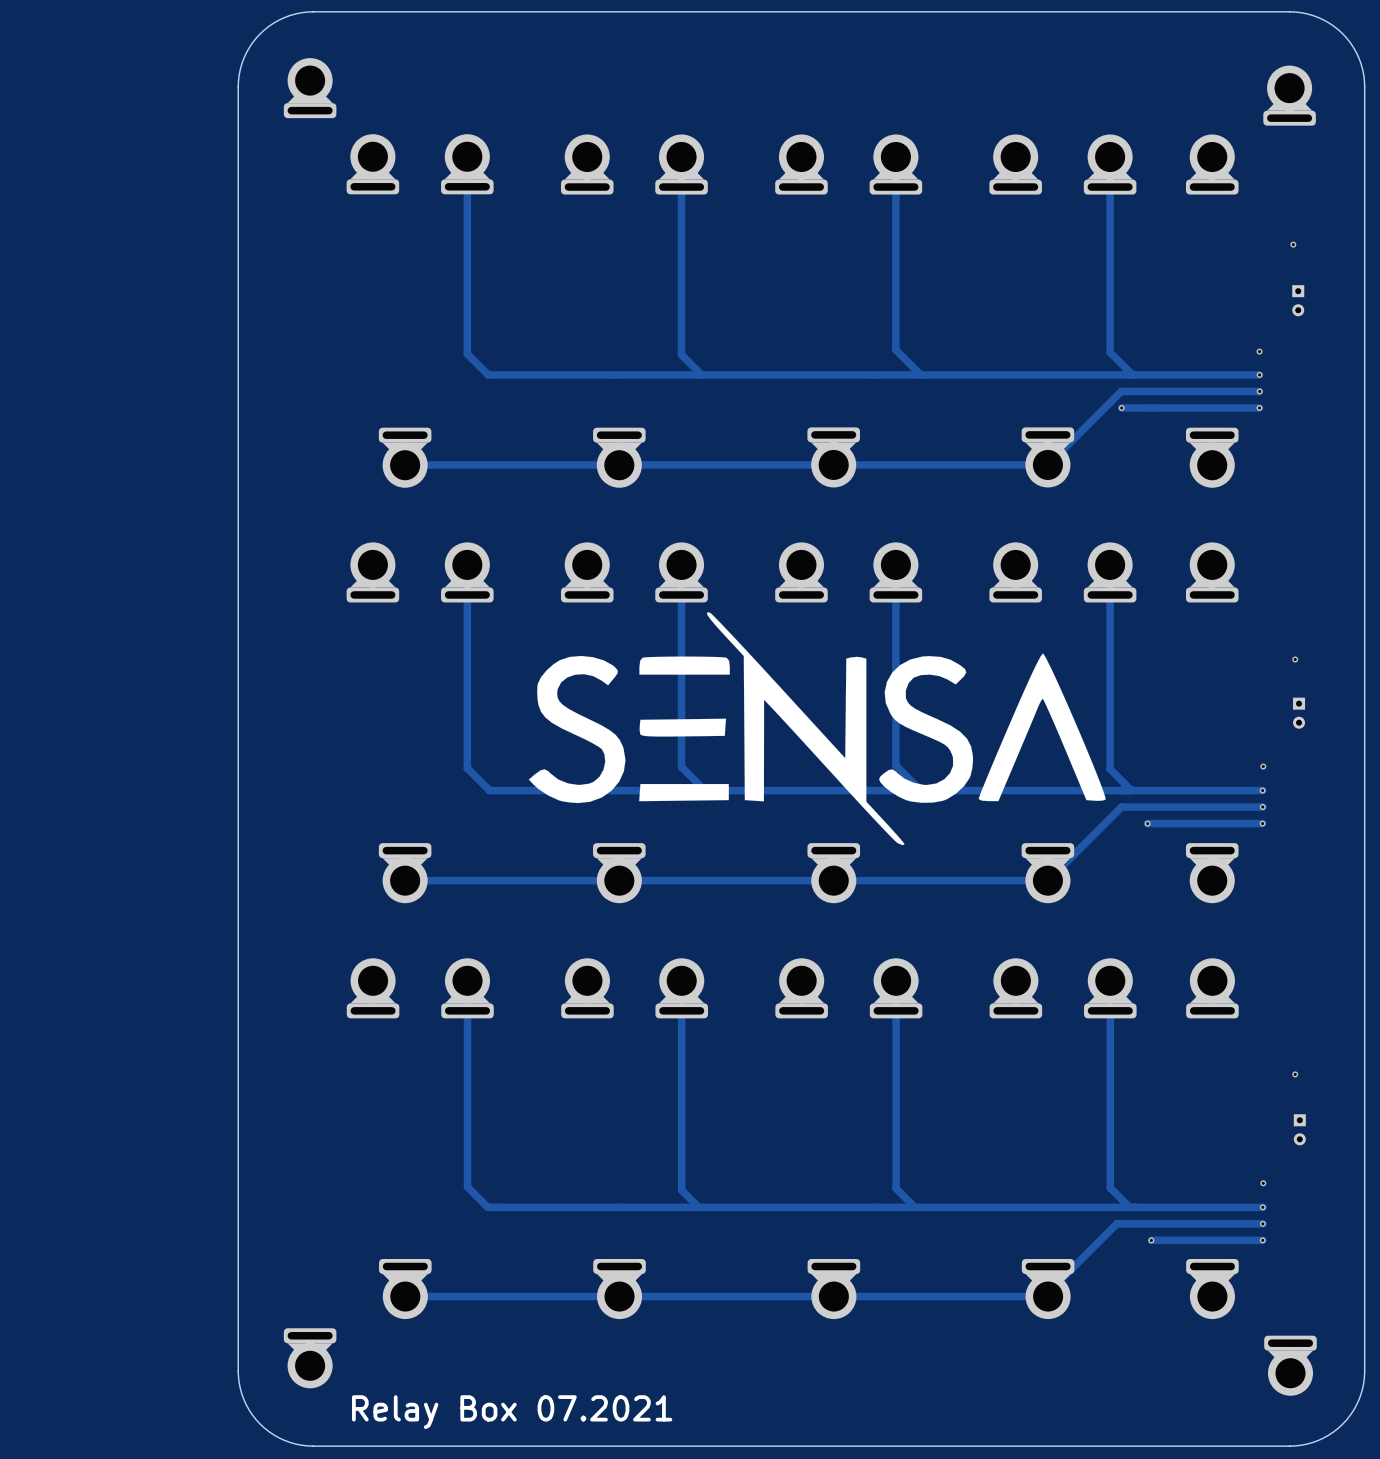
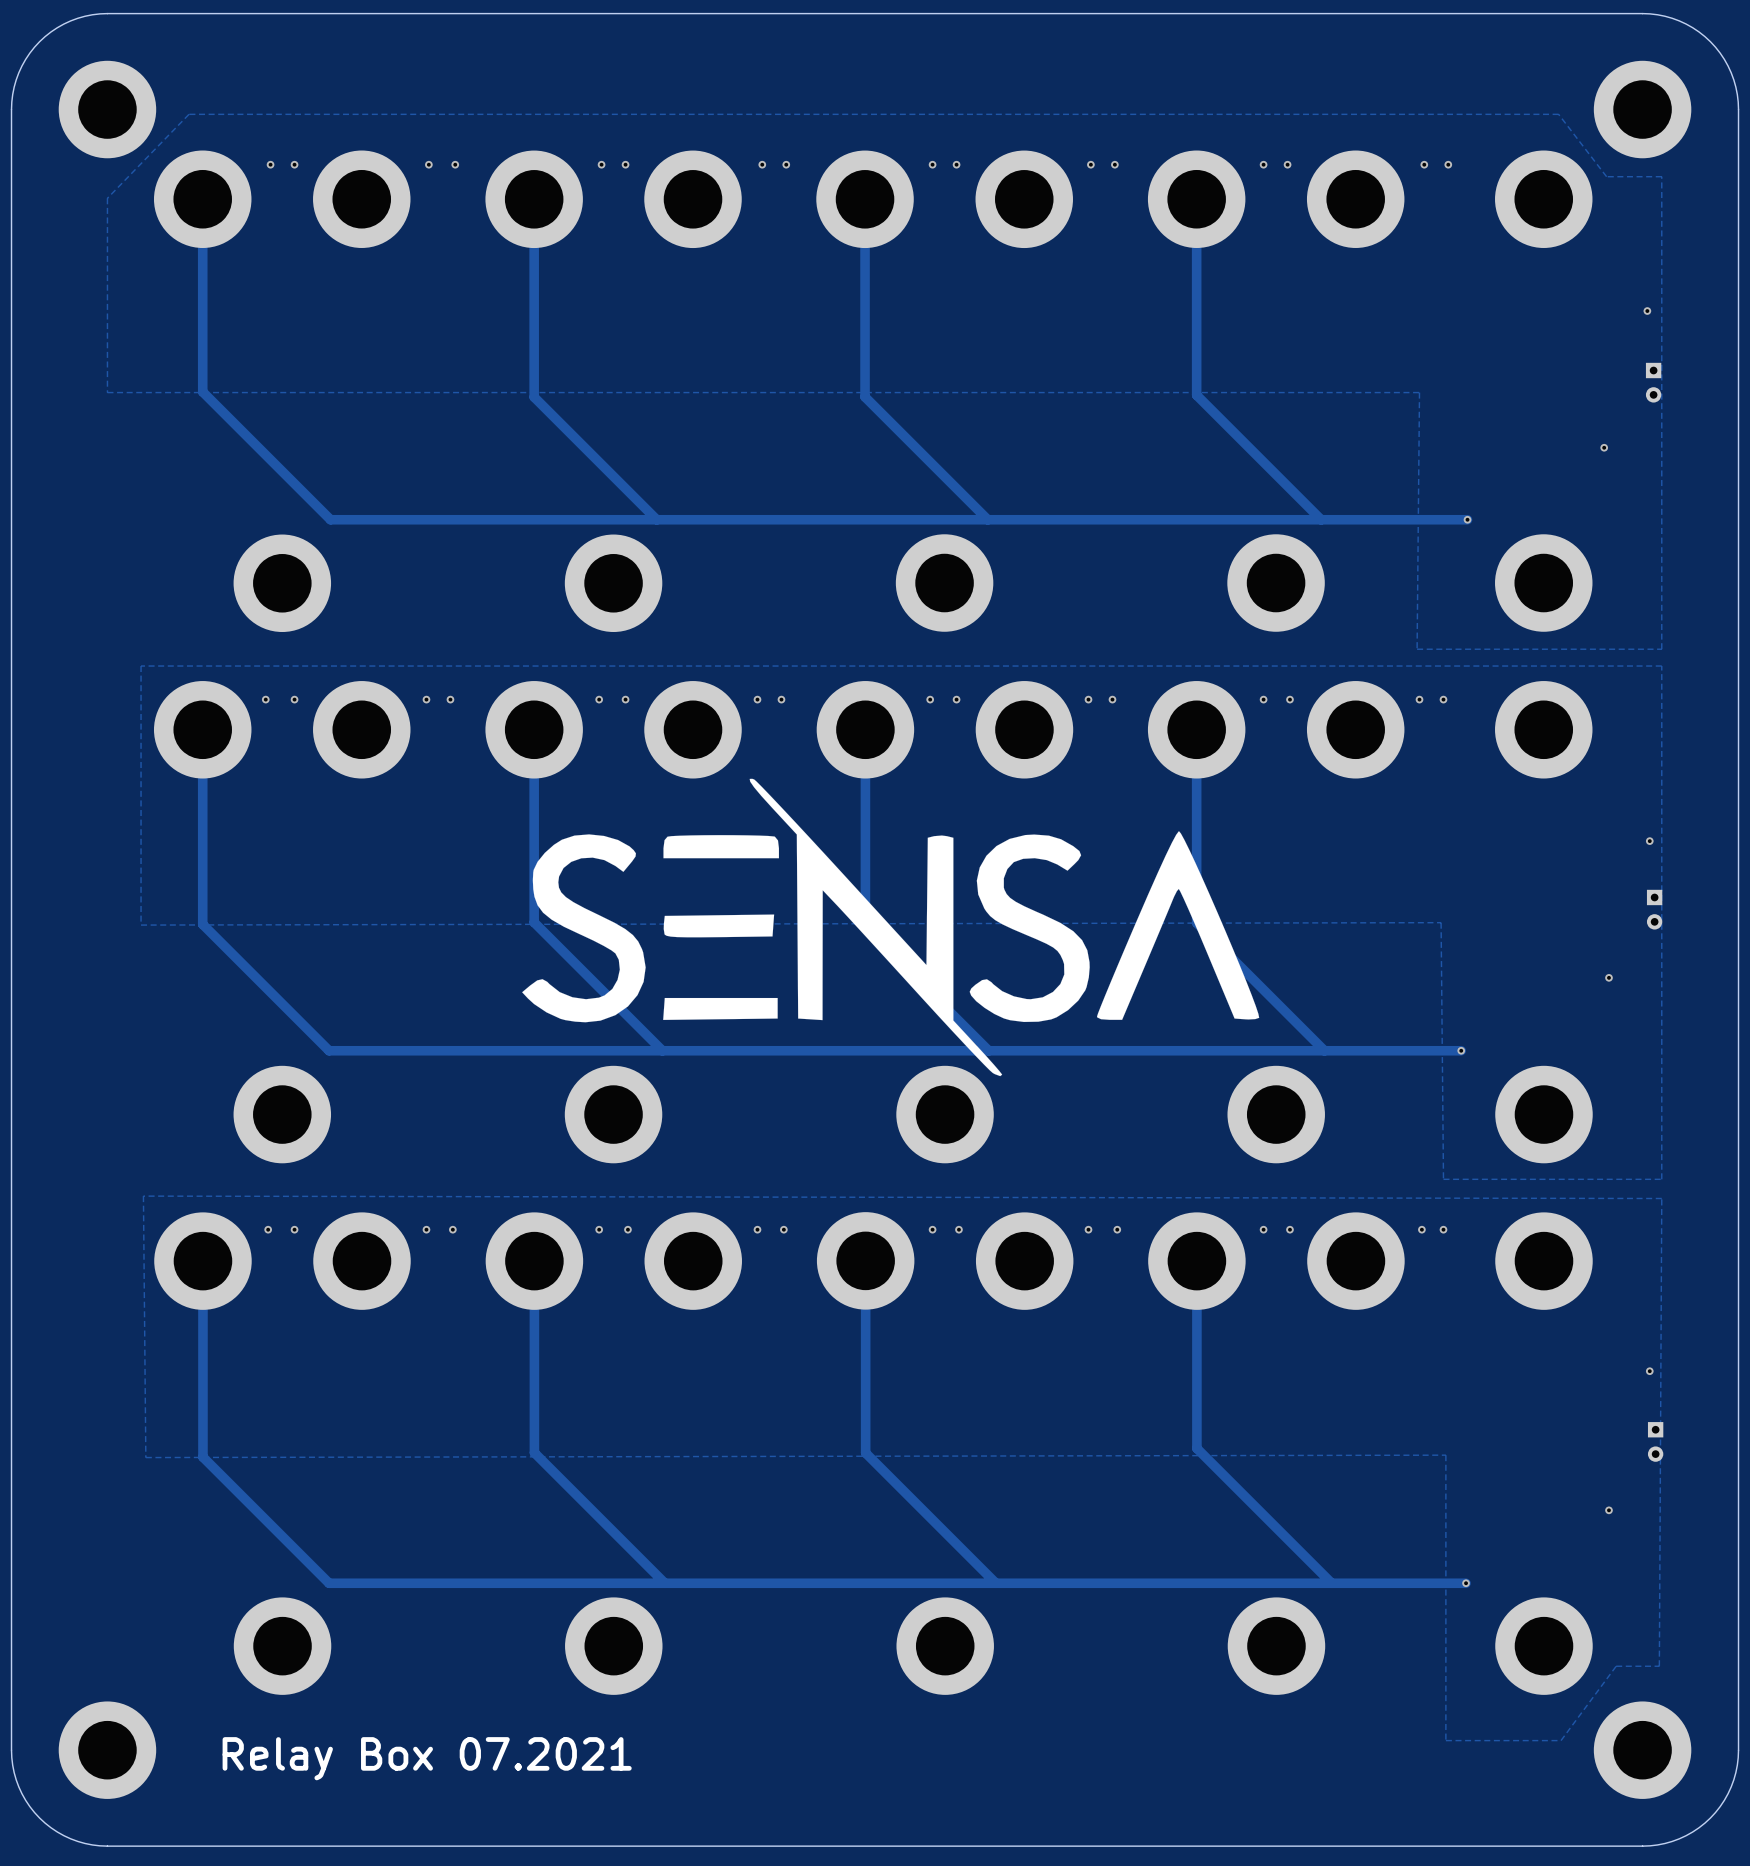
board edge: (313, 11) (284, 17) (260, 33) (243, 58) (238, 86) (238, 1376) (243, 1399) (260, 1424) (284, 1440) (313, 1446) -> (395, 13) (107, 13) (85, 16) (70, 20) (51, 31) (29, 53) (16, 79) (11, 109) (11, 1750) (14, 1772) (21, 1793) (39, 1818) (63, 1835) (92, 1844) (395, 1846)
part: none -> (107, 109)
part: none -> (1642, 109)
part: (310, 88) -> none
zone outline: none -> (1558, 114) (1606, 176) (1661, 176) (1661, 649) (1417, 649) (1419, 392) (107, 392) (107, 198) (189, 114) (1558, 114)
part: (1289, 95) -> none
via: none -> (270, 164)
via: none -> (294, 164)
via: none -> (428, 164)
via: none -> (455, 164)
via: none -> (601, 164)
via: none -> (625, 164)
via: none -> (762, 164)
via: none -> (786, 164)
via: none -> (932, 164)
via: none -> (956, 164)
via: none -> (1090, 164)
via: none -> (1114, 164)
via: none -> (1263, 164)
via: none -> (1287, 164)
via: none -> (1424, 164)
via: none -> (1448, 164)
part footprint: [655, 134, 708, 195] -> [816, 150, 914, 249]
part footprint: [1185, 134, 1239, 195] -> [1495, 150, 1593, 248]
track: (467, 156) (467, 353) (488, 374) (1259, 374) -> none
track: none -> (202, 199) (202, 391) (330, 519) (1428, 519)
part: none -> (202, 199)
part: none -> (361, 199)
track: none -> (534, 199) (534, 397) (656, 519)
part: none -> (534, 199)
part: none -> (693, 199)
track: (681, 157) (681, 354) (701, 374) -> none
track: none -> (865, 199) (865, 396) (987, 519)
part: none -> (1024, 199)
track: (895, 157) (895, 350) (920, 374) -> none
track: none -> (1196, 199) (1196, 395) (1321, 519)
part: none -> (1196, 199)
part: none -> (1355, 199)
track: (1110, 157) (1110, 352) (1132, 374) -> none
part: (372, 164) -> none
part: (467, 164) -> none
part: (587, 164) -> none
part: (801, 164) -> none
part: (895, 164) -> none
part: (1015, 164) -> none
part: (1110, 164) -> none
via: (1259, 374) -> none
track: (1259, 391) (1121, 391) (1047, 464) (405, 464) -> none
via: (1259, 391) -> none
via position: (1121, 407) -> (1467, 519)
track: (1259, 407) (1152, 407) -> none
via: (1259, 407) -> none
part footprint: [1185, 427, 1239, 488] -> [1495, 534, 1593, 632]
part: none -> (282, 583)
part: (405, 457) -> none
part: none -> (613, 583)
part: (619, 457) -> none
part: none -> (944, 583)
part: (833, 457) -> none
part: none -> (1276, 583)
part: (1047, 457) -> none
zone outline: none -> (1661, 666) (1661, 1179) (1443, 1179) (1441, 922) (141, 925) (141, 666) (1661, 666)
part footprint: [655, 542, 708, 603] -> [816, 681, 915, 779]
part footprint: [775, 542, 828, 603] -> [975, 681, 1074, 779]
part footprint: [1185, 542, 1239, 603] -> [1495, 681, 1593, 779]
via: none -> (265, 699)
via: none -> (294, 699)
via: none -> (426, 699)
via: none -> (450, 699)
via: none -> (599, 699)
via: none -> (625, 699)
via: none -> (757, 699)
via: none -> (781, 699)
via: none -> (930, 699)
via: none -> (956, 699)
via: none -> (1088, 699)
via: none -> (1112, 699)
via: none -> (1263, 699)
via: none -> (1289, 699)
via: none -> (1419, 699)
via: none -> (1443, 699)
track: (681, 564) (681, 767) (705, 790) -> none
track: (895, 564) (895, 765) (920, 790) -> none
track: (1110, 564) (1110, 769) (1131, 790) (489, 790) (467, 768) (467, 564) -> none
part: none -> (202, 729)
part: none -> (361, 729)
part: (372, 572) -> none
track: none -> (534, 729) (534, 922) (662, 1050)
part: none -> (534, 729)
part: (467, 572) -> none
part: none -> (693, 729)
part: (587, 572) -> none
track: none -> (865, 729) (865, 927) (988, 1050)
part: (895, 572) -> none
track: none -> (1196, 729) (1196, 922) (1324, 1050)
part: none -> (1196, 729)
part: (1015, 572) -> none
part: none -> (1355, 729)
part: (1110, 572) -> none
drawing position: (817, 728) -> (890, 927)
track: (1262, 790) (1120, 790) -> none
via: (1262, 790) -> none
track: (1262, 807) (1121, 807) (1047, 880) (405, 880) -> none
via: (1262, 807) -> none
track: (1262, 823) (1147, 823) -> (202, 729) (202, 924) (329, 1050) (1461, 1050)
via: (1262, 823) -> none
part footprint: [1185, 843, 1239, 904] -> [1495, 1065, 1593, 1164]
part: none -> (282, 1114)
part: (405, 873) -> none
part: none -> (613, 1114)
part: (619, 873) -> none
part: none -> (945, 1114)
part: (833, 873) -> none
part: none -> (1276, 1114)
part: (1047, 873) -> none
zone outline: none -> (143, 1196) (1661, 1198) (1659, 1666) (1616, 1666) (1561, 1740) (1445, 1740) (1445, 1455) (145, 1457) (143, 1196)
part footprint: [655, 958, 709, 1019] -> [816, 1212, 915, 1310]
part footprint: [775, 958, 828, 1019] -> [975, 1212, 1074, 1310]
part footprint: [1186, 958, 1239, 1019] -> [1495, 1212, 1593, 1310]
via: none -> (268, 1229)
via: none -> (294, 1229)
via: none -> (426, 1229)
via: none -> (452, 1229)
via: none -> (599, 1229)
via: none -> (627, 1229)
via: none -> (757, 1229)
via: none -> (783, 1229)
via: none -> (932, 1229)
via: none -> (958, 1229)
via: none -> (1088, 1229)
via: none -> (1117, 1229)
via: none -> (1263, 1229)
via: none -> (1289, 1229)
via: none -> (1421, 1229)
via: none -> (1443, 1229)
track: (467, 980) (467, 1187) (487, 1207) (1262, 1207) -> none
track: (681, 980) (681, 1190) (698, 1207) -> none
track: (896, 980) (896, 1188) (914, 1207) -> none
track: (1110, 980) (1110, 1188) (1129, 1207) -> none
part: none -> (202, 1261)
part: none -> (361, 1261)
part: (373, 988) -> none
track: none -> (534, 1261) (534, 1452) (664, 1583)
part: none -> (534, 1261)
part: (467, 988) -> none
part: none -> (693, 1261)
part: (587, 988) -> none
track: none -> (865, 1260) (865, 1453) (995, 1583)
part: (896, 988) -> none
track: none -> (1196, 1261) (1196, 1448) (1331, 1583)
part: none -> (1196, 1261)
part: (1015, 988) -> none
part: none -> (1355, 1261)
part: (1110, 988) -> none
via: (1262, 1207) -> none
track: (1262, 1223) (1116, 1223) (1048, 1292) (1048, 1296) (405, 1296) -> none
via: (1262, 1223) -> none
track: (1262, 1240) (1151, 1240) -> (202, 1261) (202, 1457) (329, 1583) (1466, 1583)
via: (1262, 1240) -> none
part footprint: [1186, 1258, 1239, 1320] -> [1495, 1597, 1593, 1695]
part: none -> (282, 1646)
part: (405, 1289) -> none
part: none -> (613, 1646)
part: (619, 1289) -> none
part: none -> (945, 1646)
part: (833, 1289) -> none
part: none -> (1276, 1646)
part: (1048, 1289) -> none
part footprint: [1264, 1335, 1317, 1396] -> [1593, 1701, 1692, 1799]
part: (310, 1358) -> none
part: none -> (107, 1750)
text position: Relay Box 07.2021 (512, 1412) -> Relay Box 07.2021 (427, 1758)

